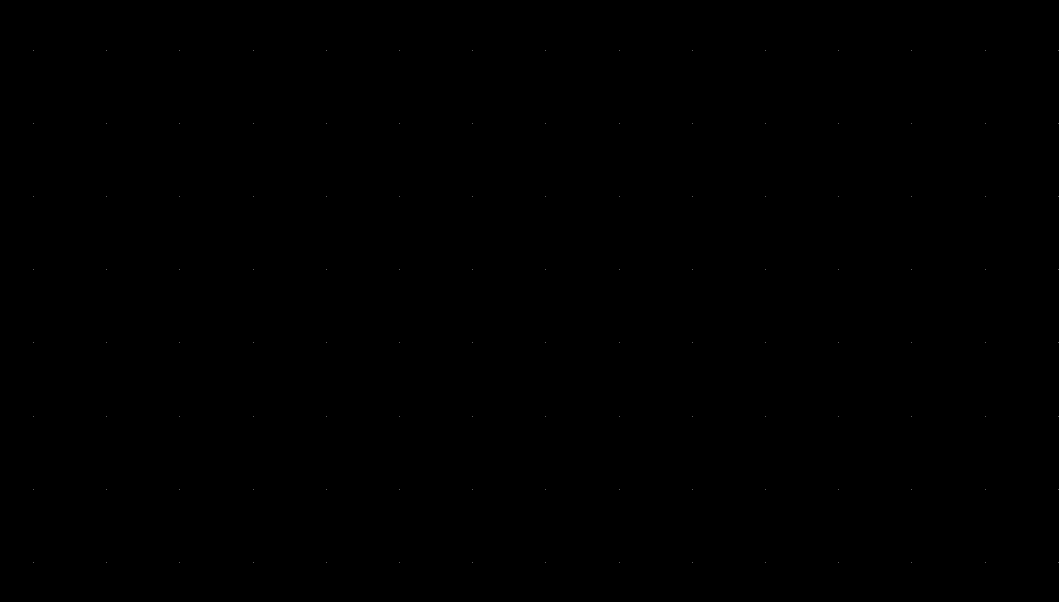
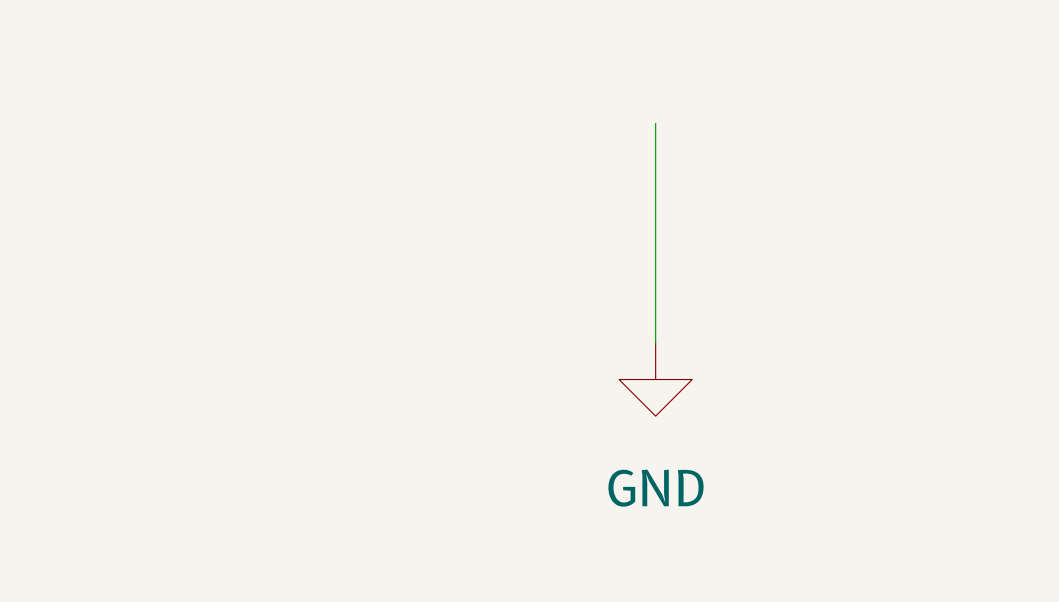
wire: none -> (655, 123) (655, 342)
power symbol: none -> GND (655, 379)

